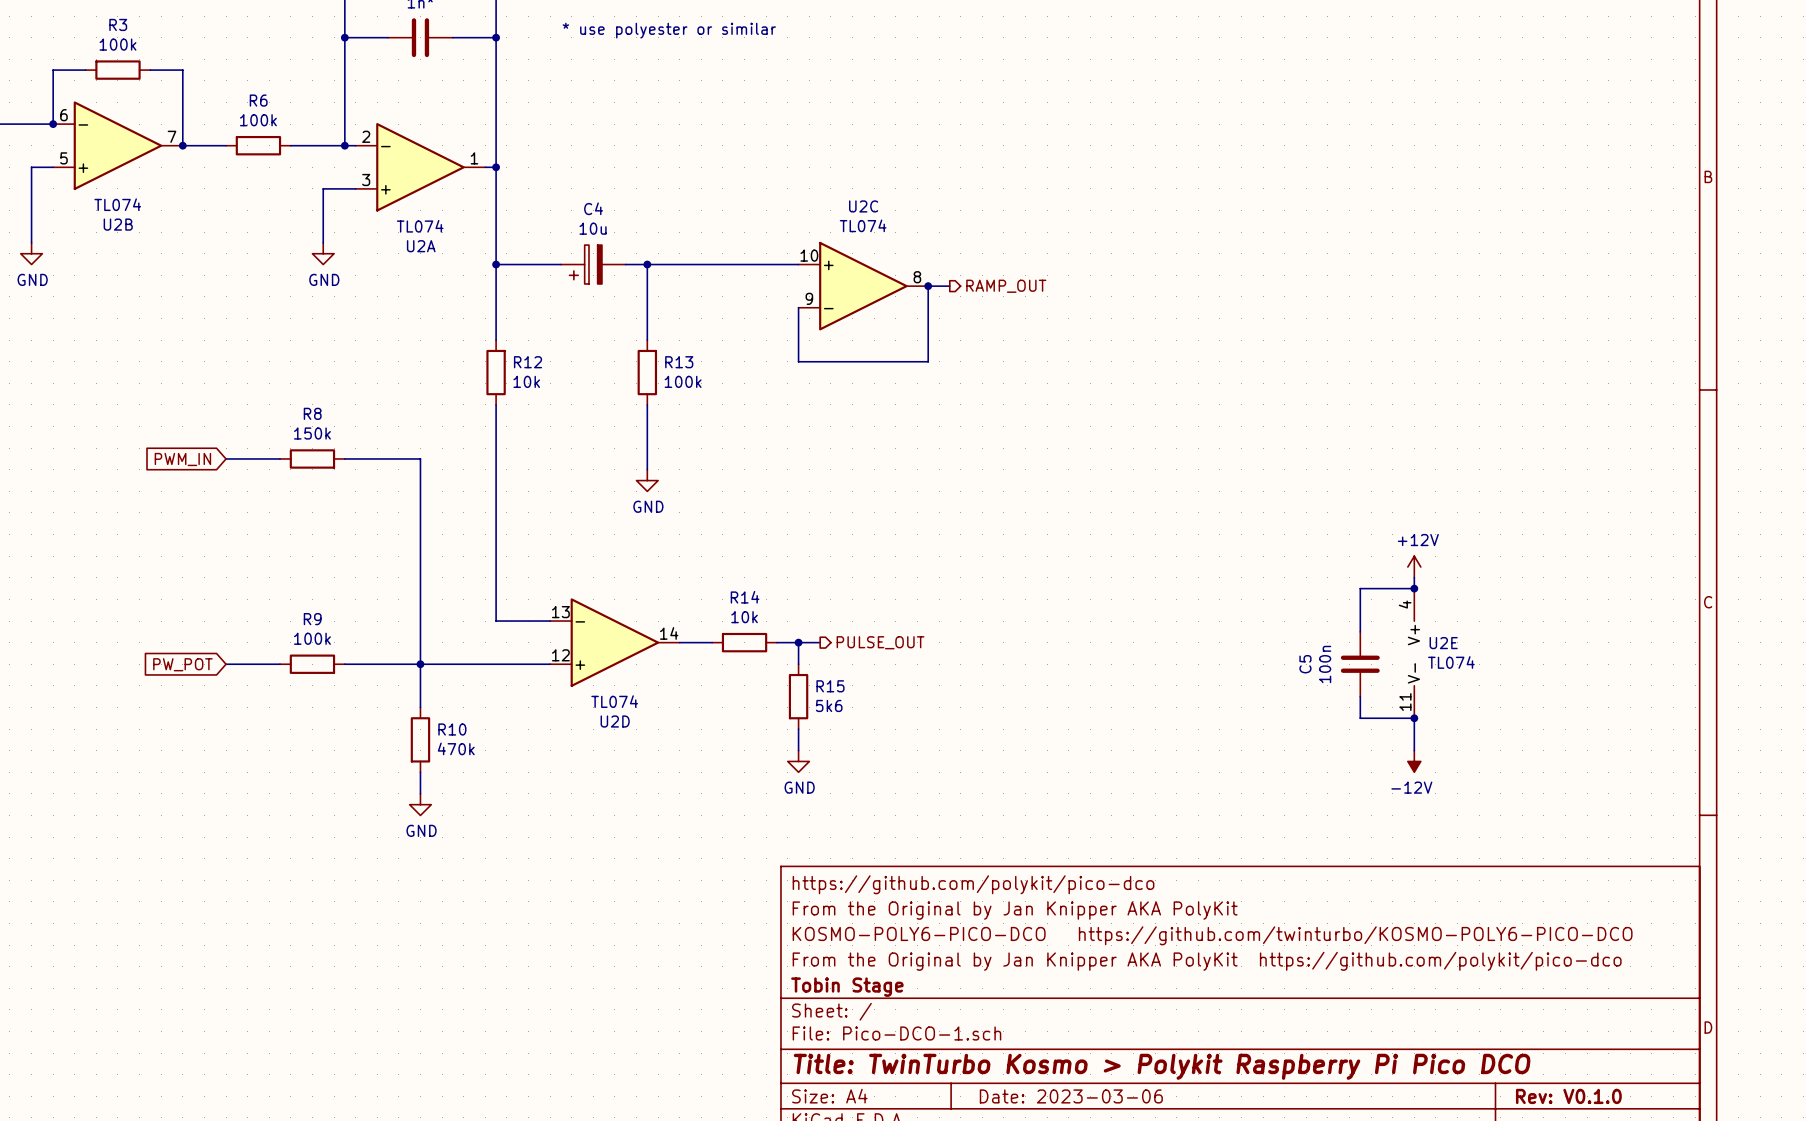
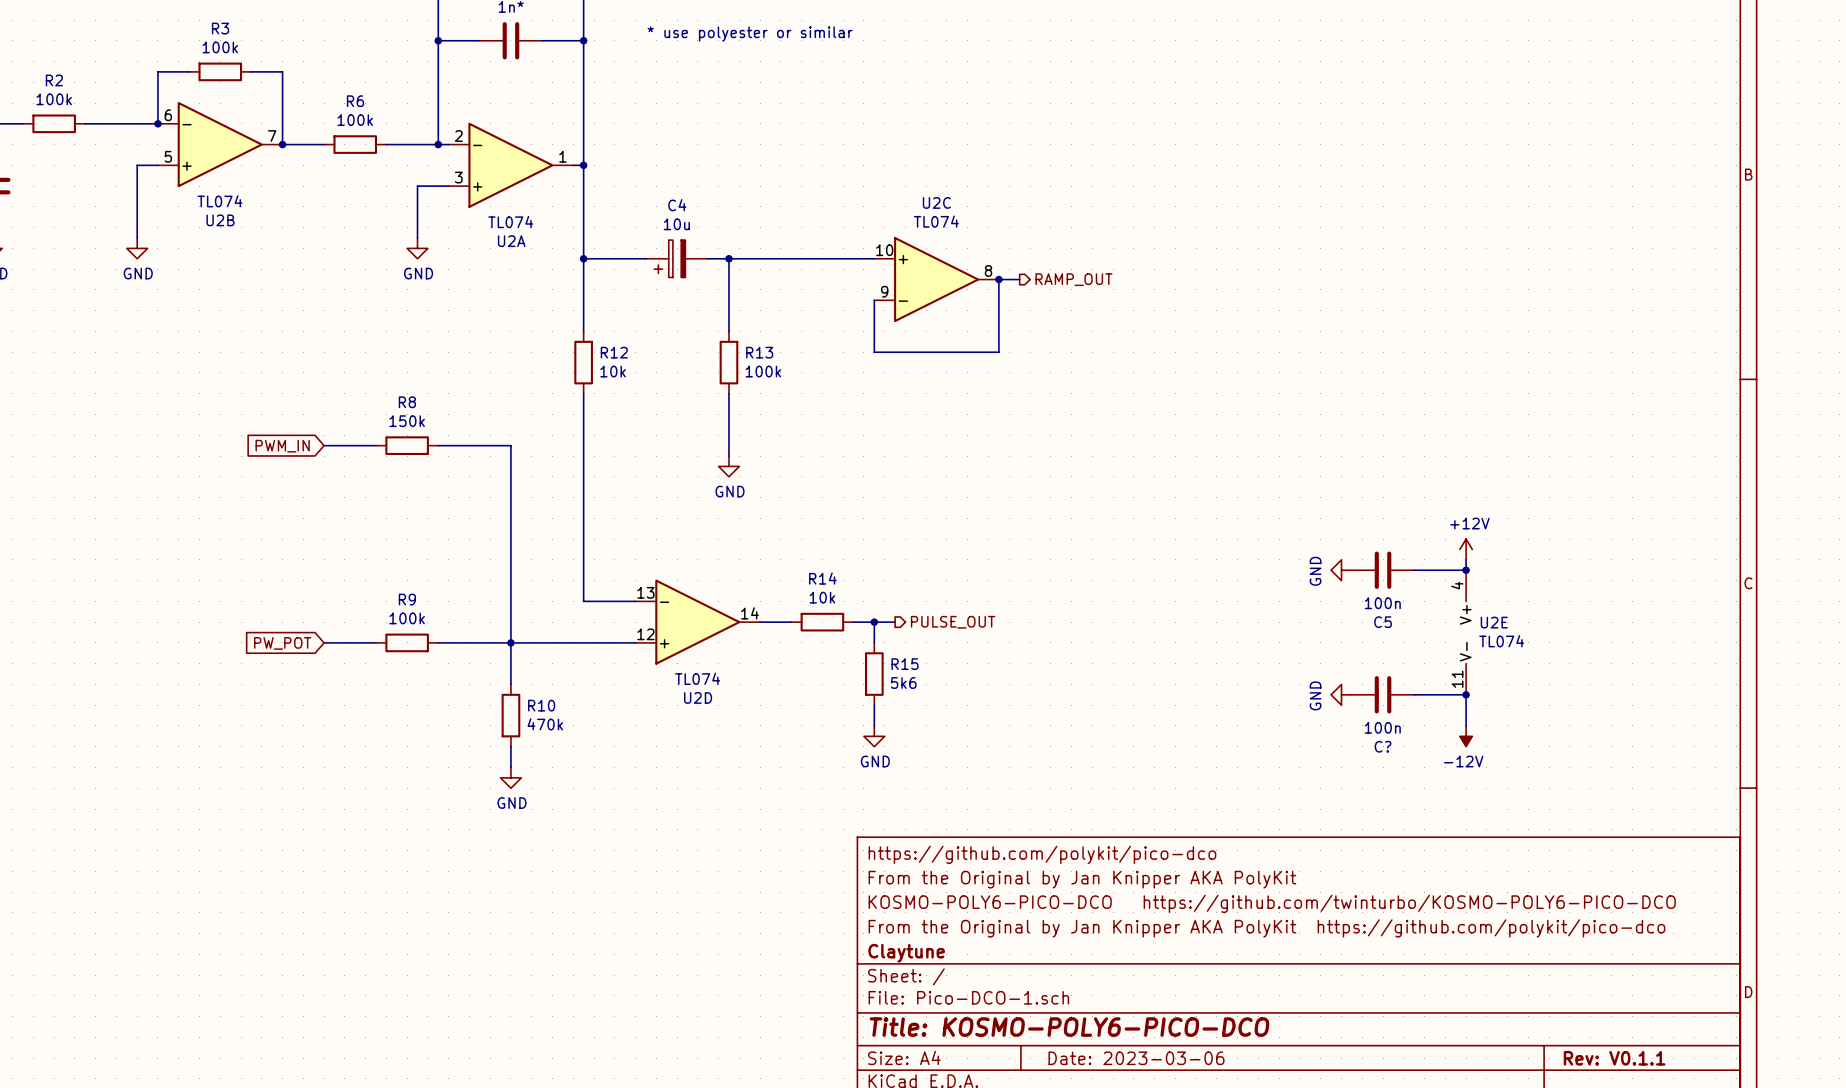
power symbol: none -> GND (1341, 570)
wire: (1360, 588) (1360, 631) -> none
C5 name position: C5 (1305, 664) -> C5 (1383, 622)
C5 value position: 100n (1325, 664) -> 100n (1382, 603)
C5 rotation: 0° (1360, 664) -> 90° clockwise (1383, 570)
C5 position: (1360, 664) -> (1383, 570)
wire: (1360, 696) (1360, 718) -> none
power symbol: none -> GND (1341, 694)
C?: none -> 100n (1383, 694)
title block: Tobin Stage (847, 987) -> Claytune (906, 953)
title block: Title: TwinTurbo Kosmo > Polykit Raspberry Pi Pico DCO (1162, 1066) -> Title: KOSMO-POLY6-PICO-DCO (1069, 1027)
title block: Rev: V0.1.0 (1568, 1096) -> Rev: V0.1.1 (1614, 1058)

